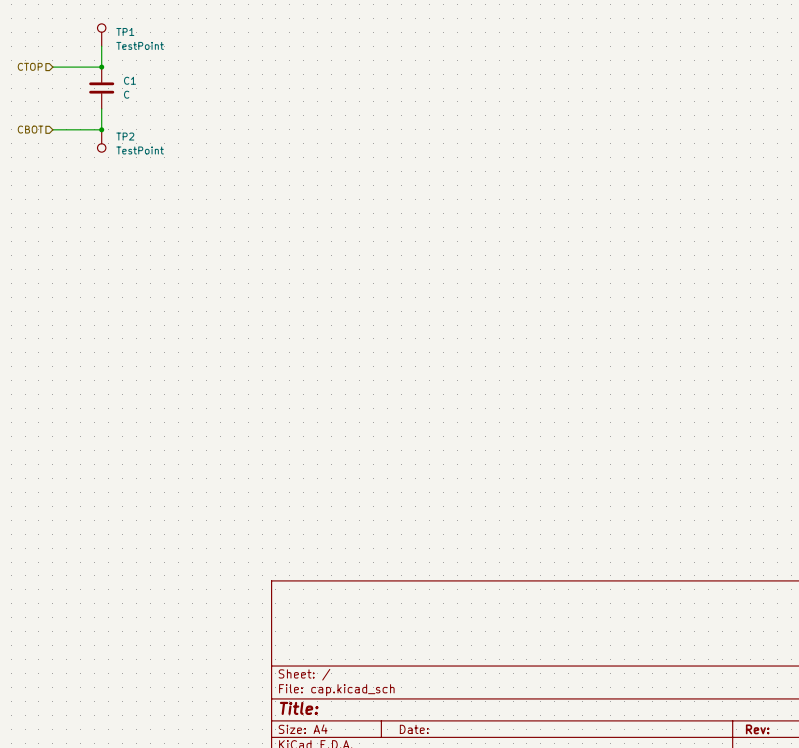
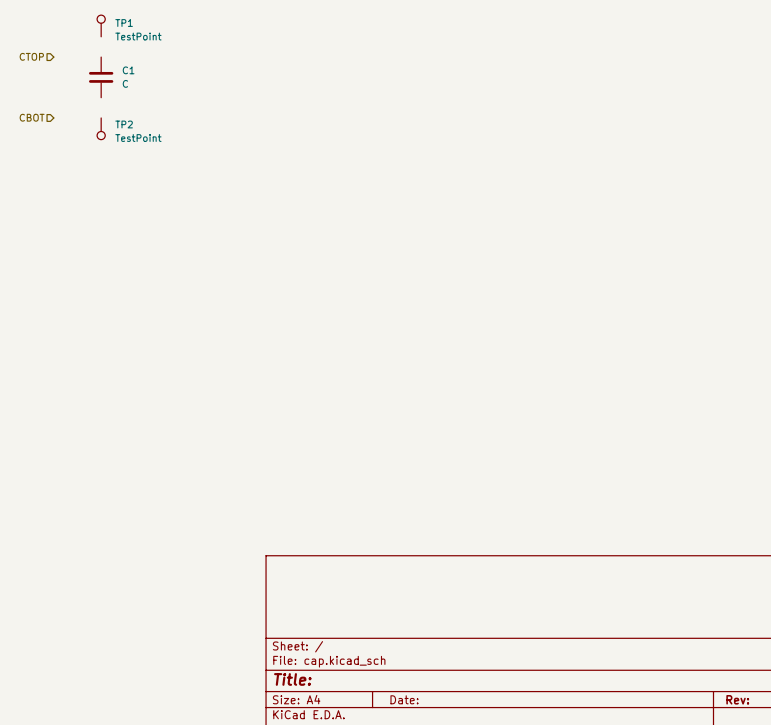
wire: (101, 46) (101, 67) (52, 67) -> none
junction: (101, 67) -> none
wire: (101, 108) (101, 129) (52, 129) -> none
junction: (101, 129) -> none

